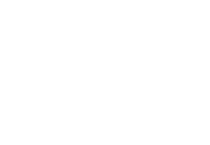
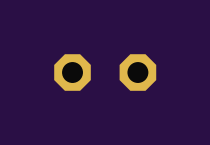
part: none -> (105, 72)

